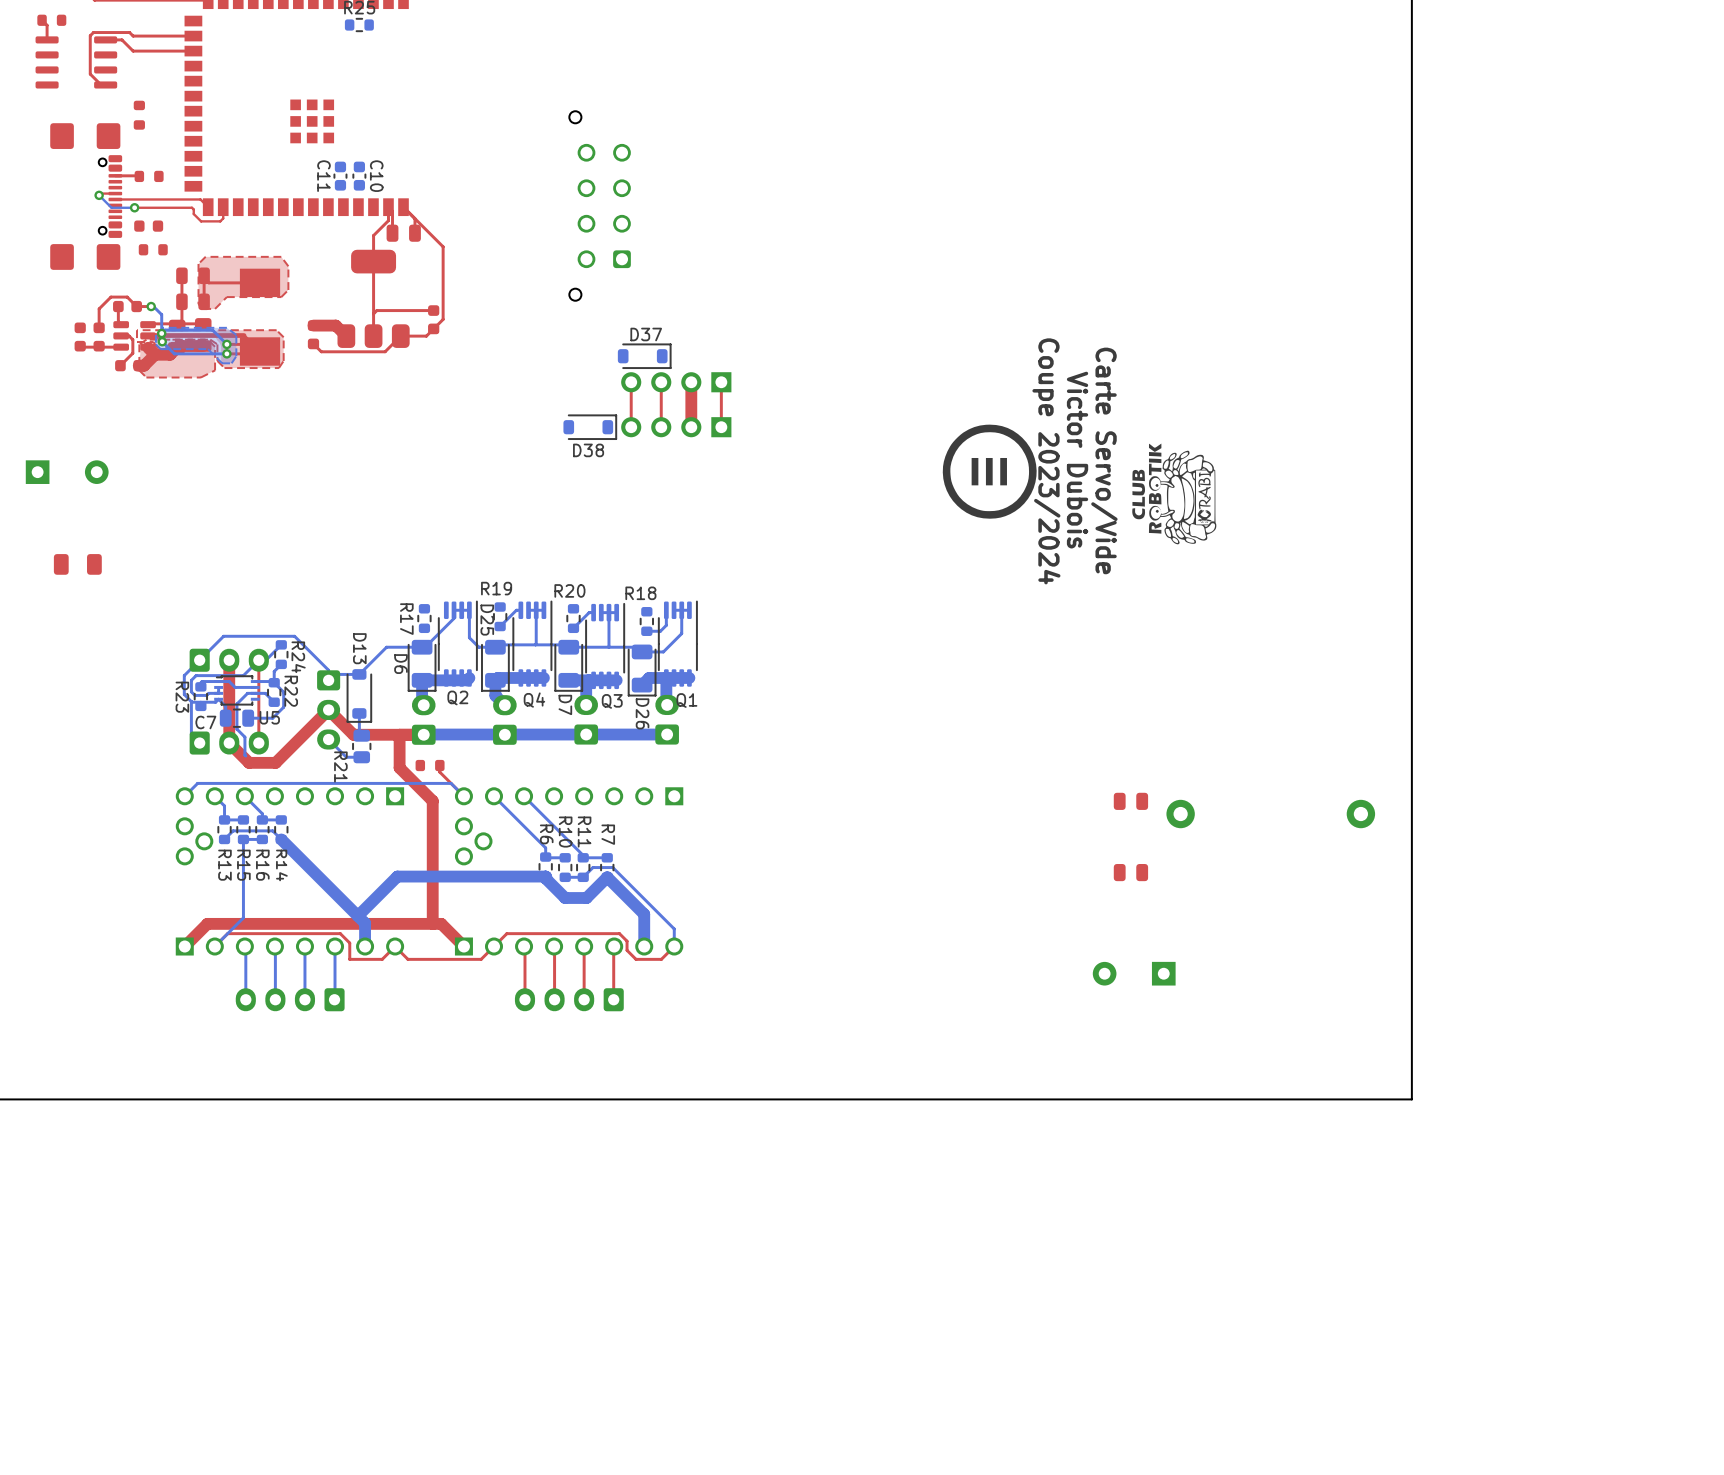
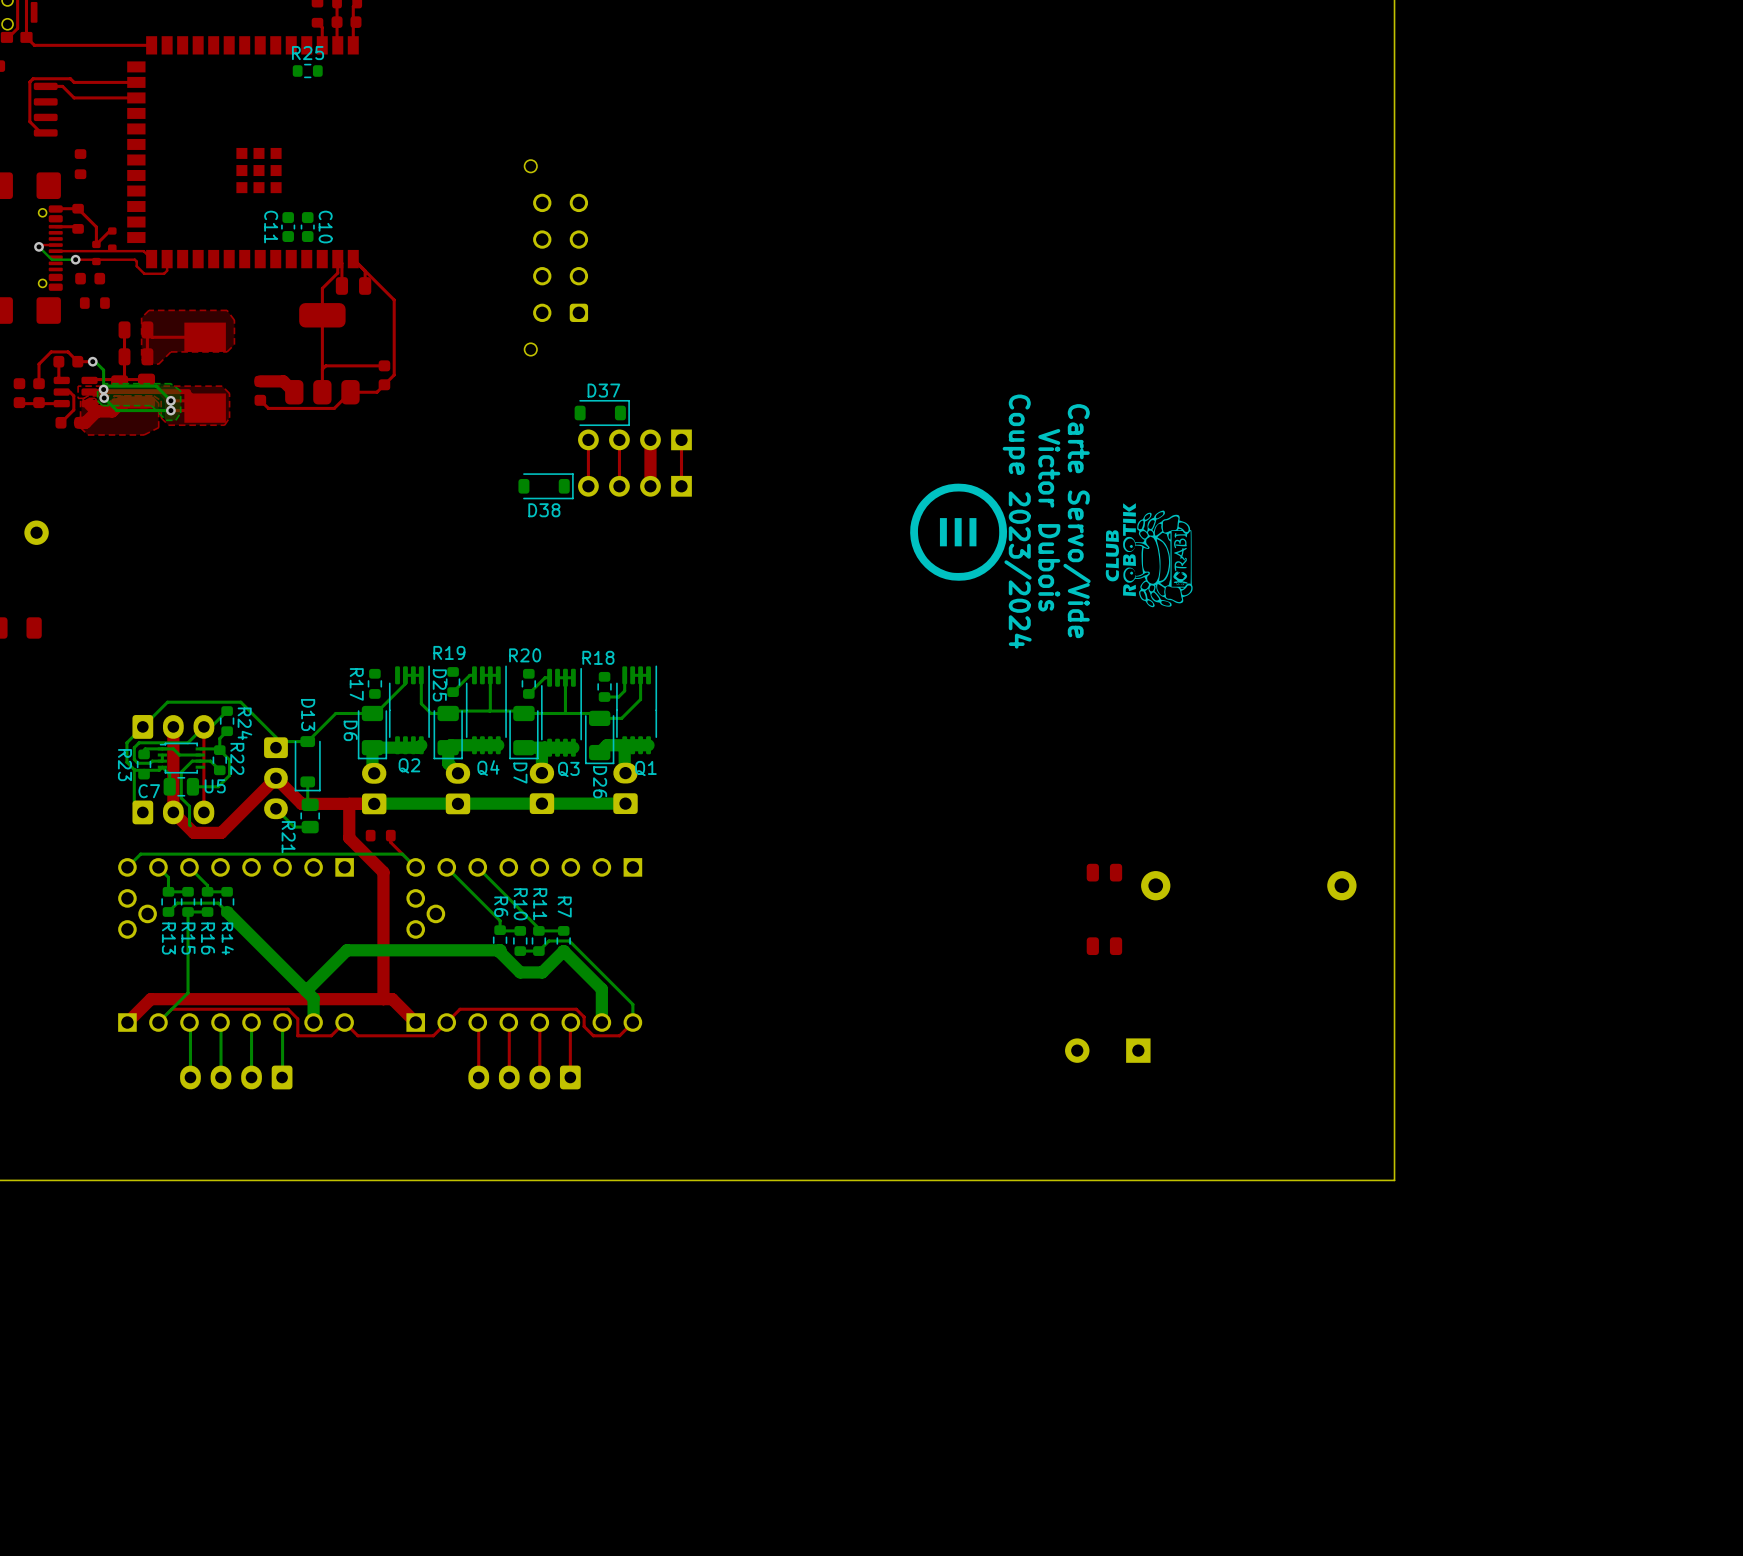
top track: none -> (55, 209) (78, 208) (96, 227) (96, 244) (109, 231) (112, 231)
part rotation: 0° (149, 176) -> 90° clockwise (78, 218)
part: none -> (112, 239)
part: none -> (96, 252)

